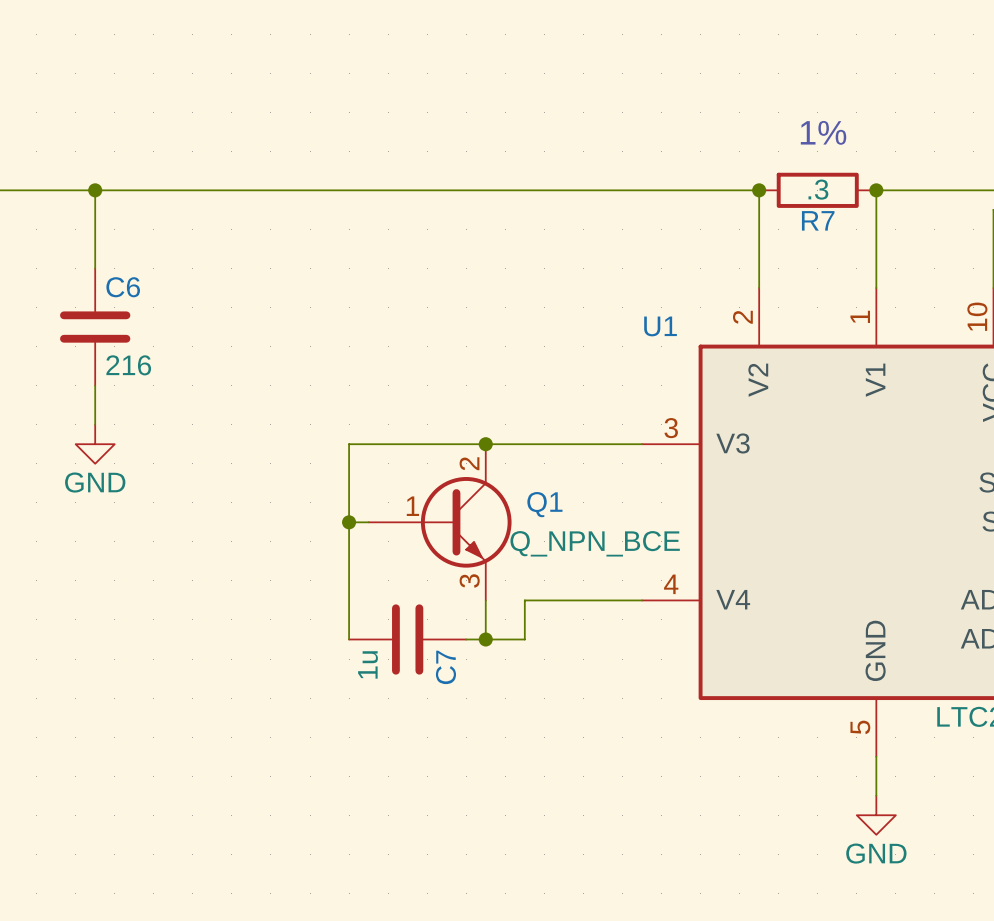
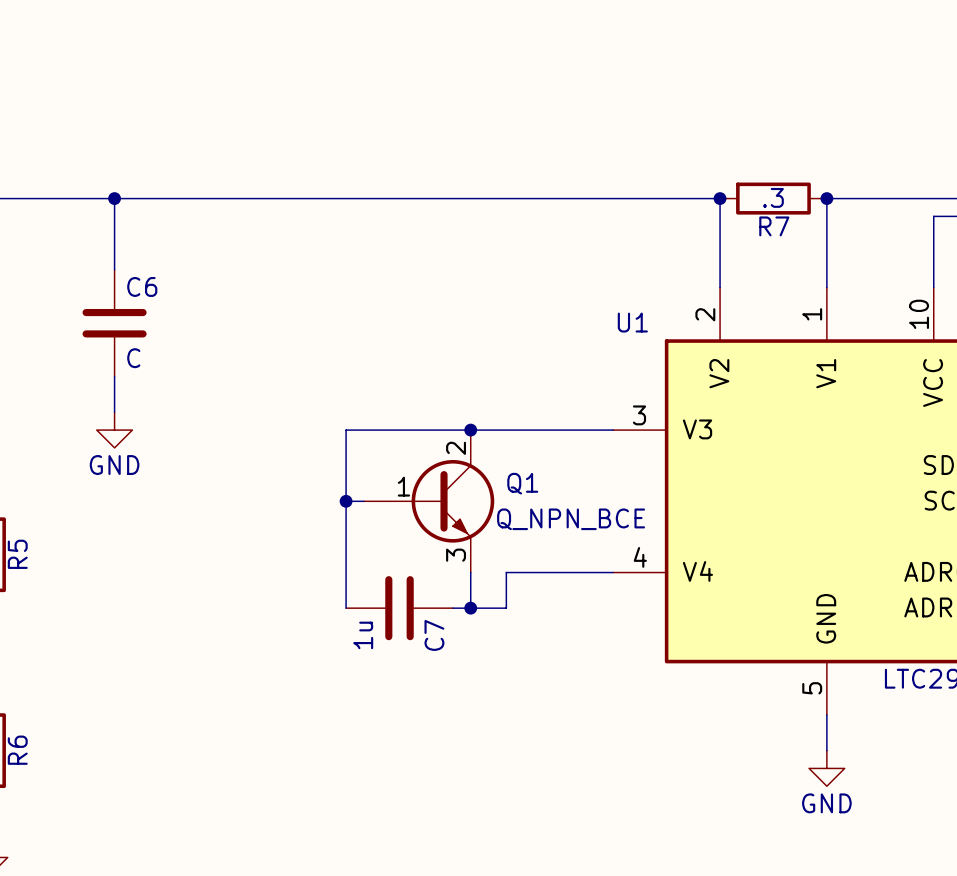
text: 1% (823, 132) -> none
C6 value: 216 (128, 365) -> C (133, 358)

